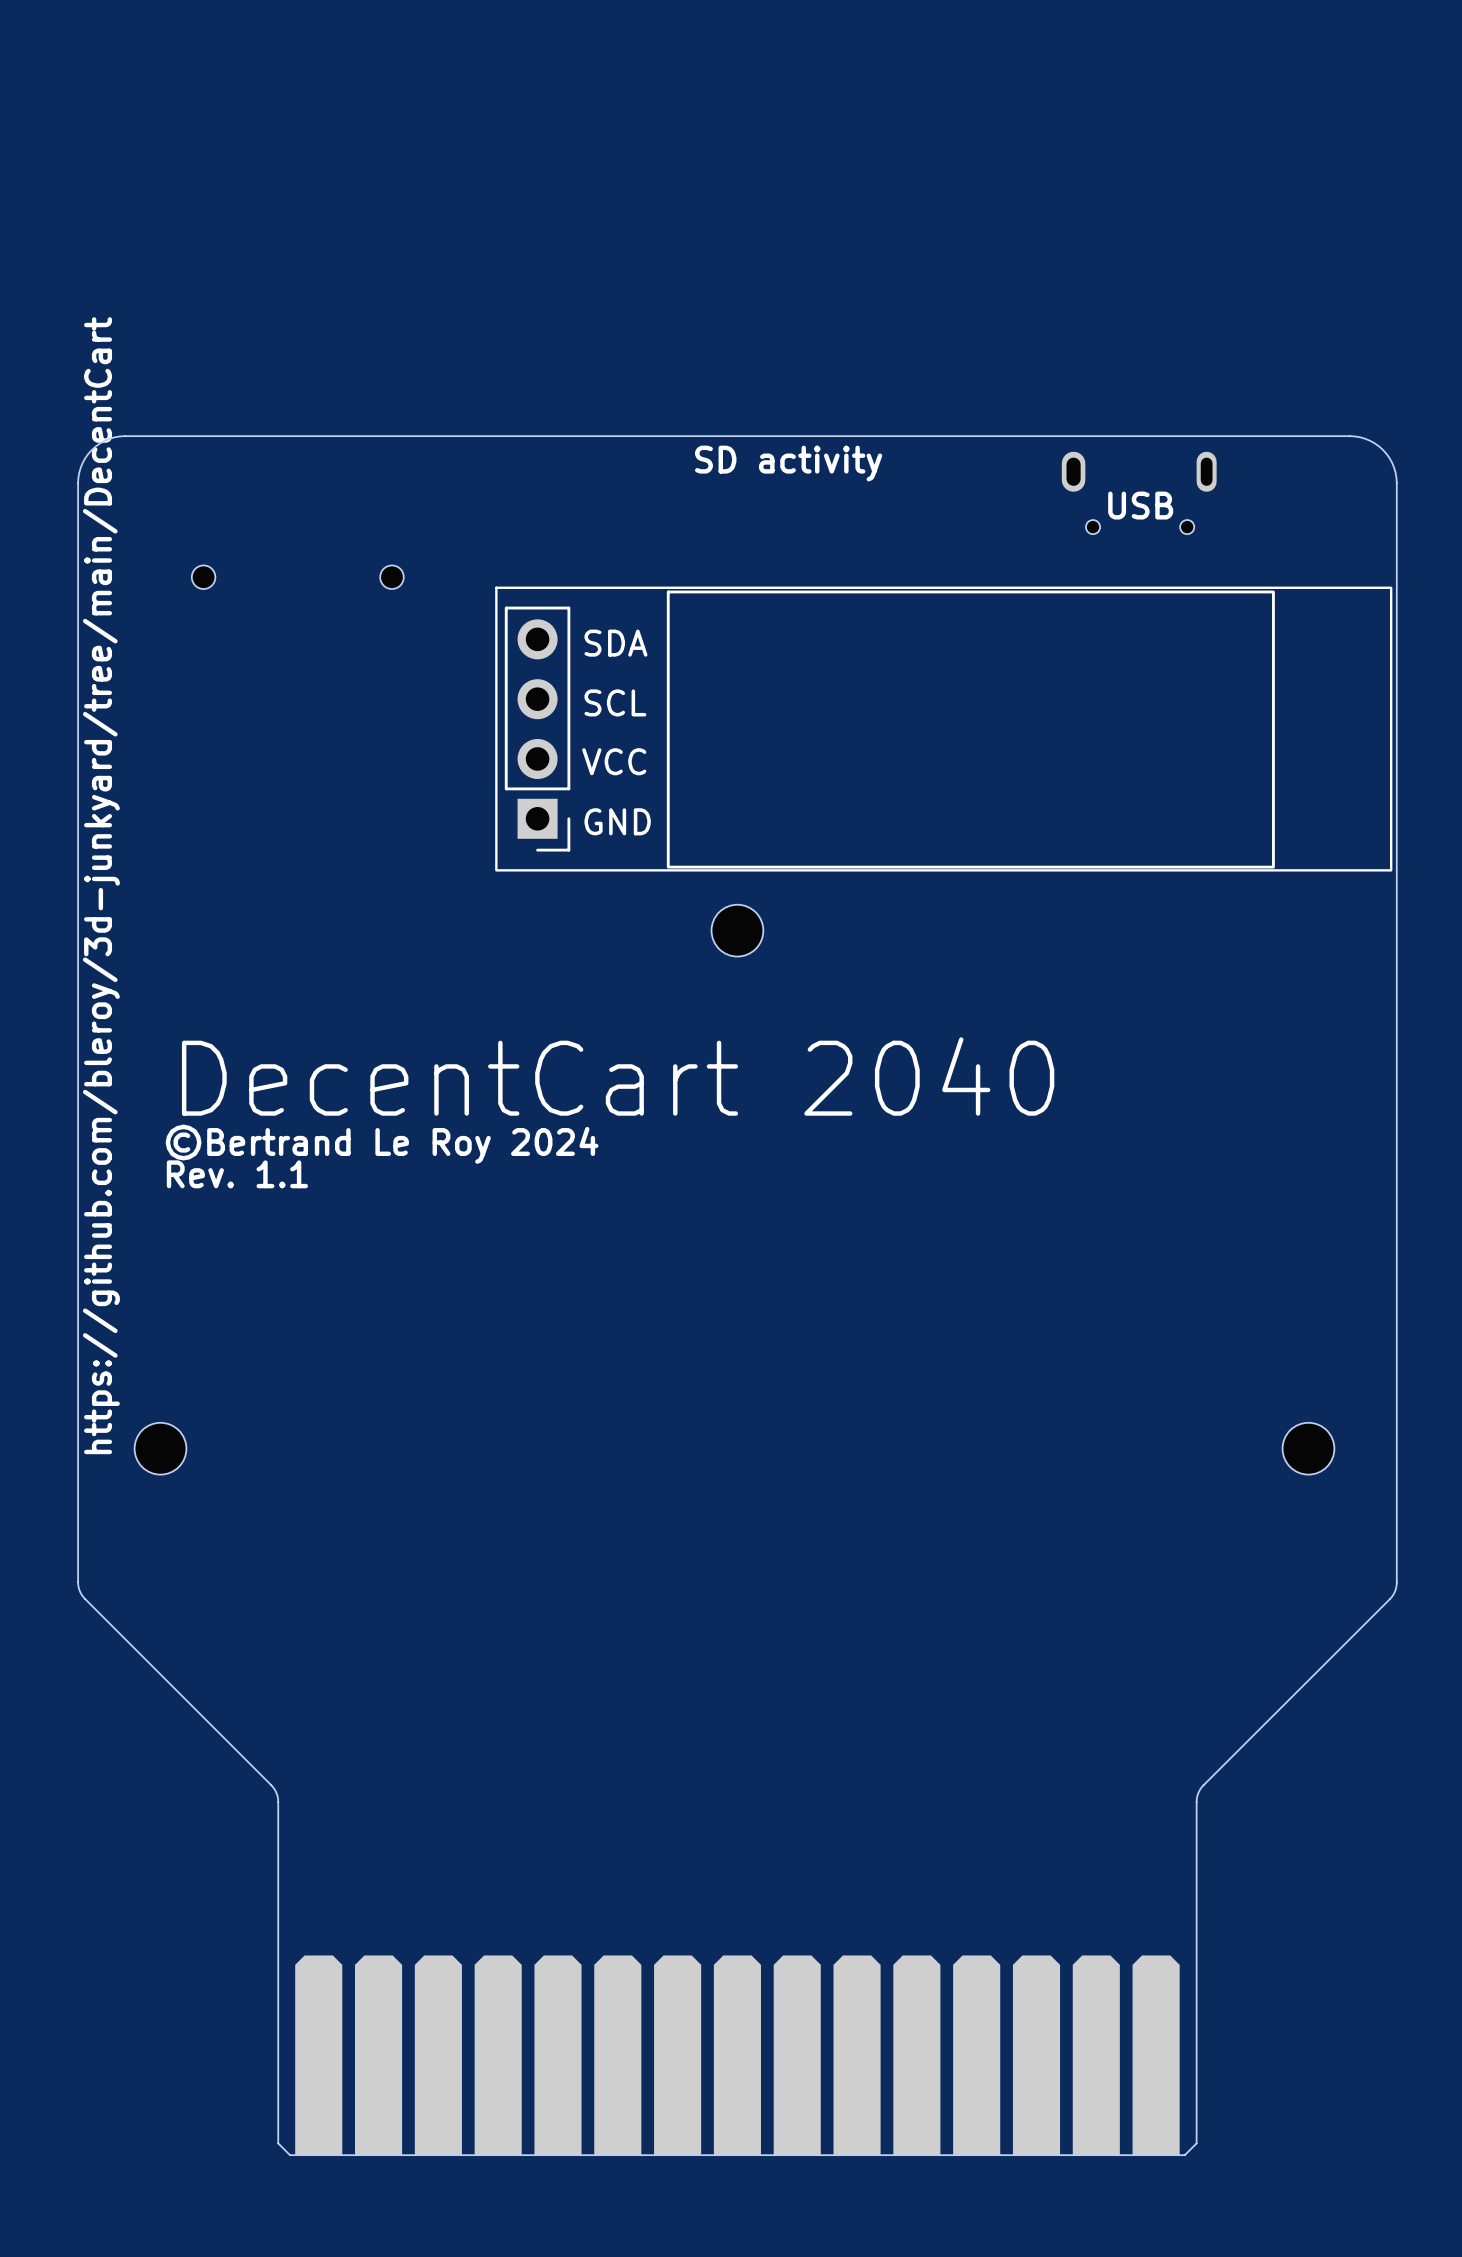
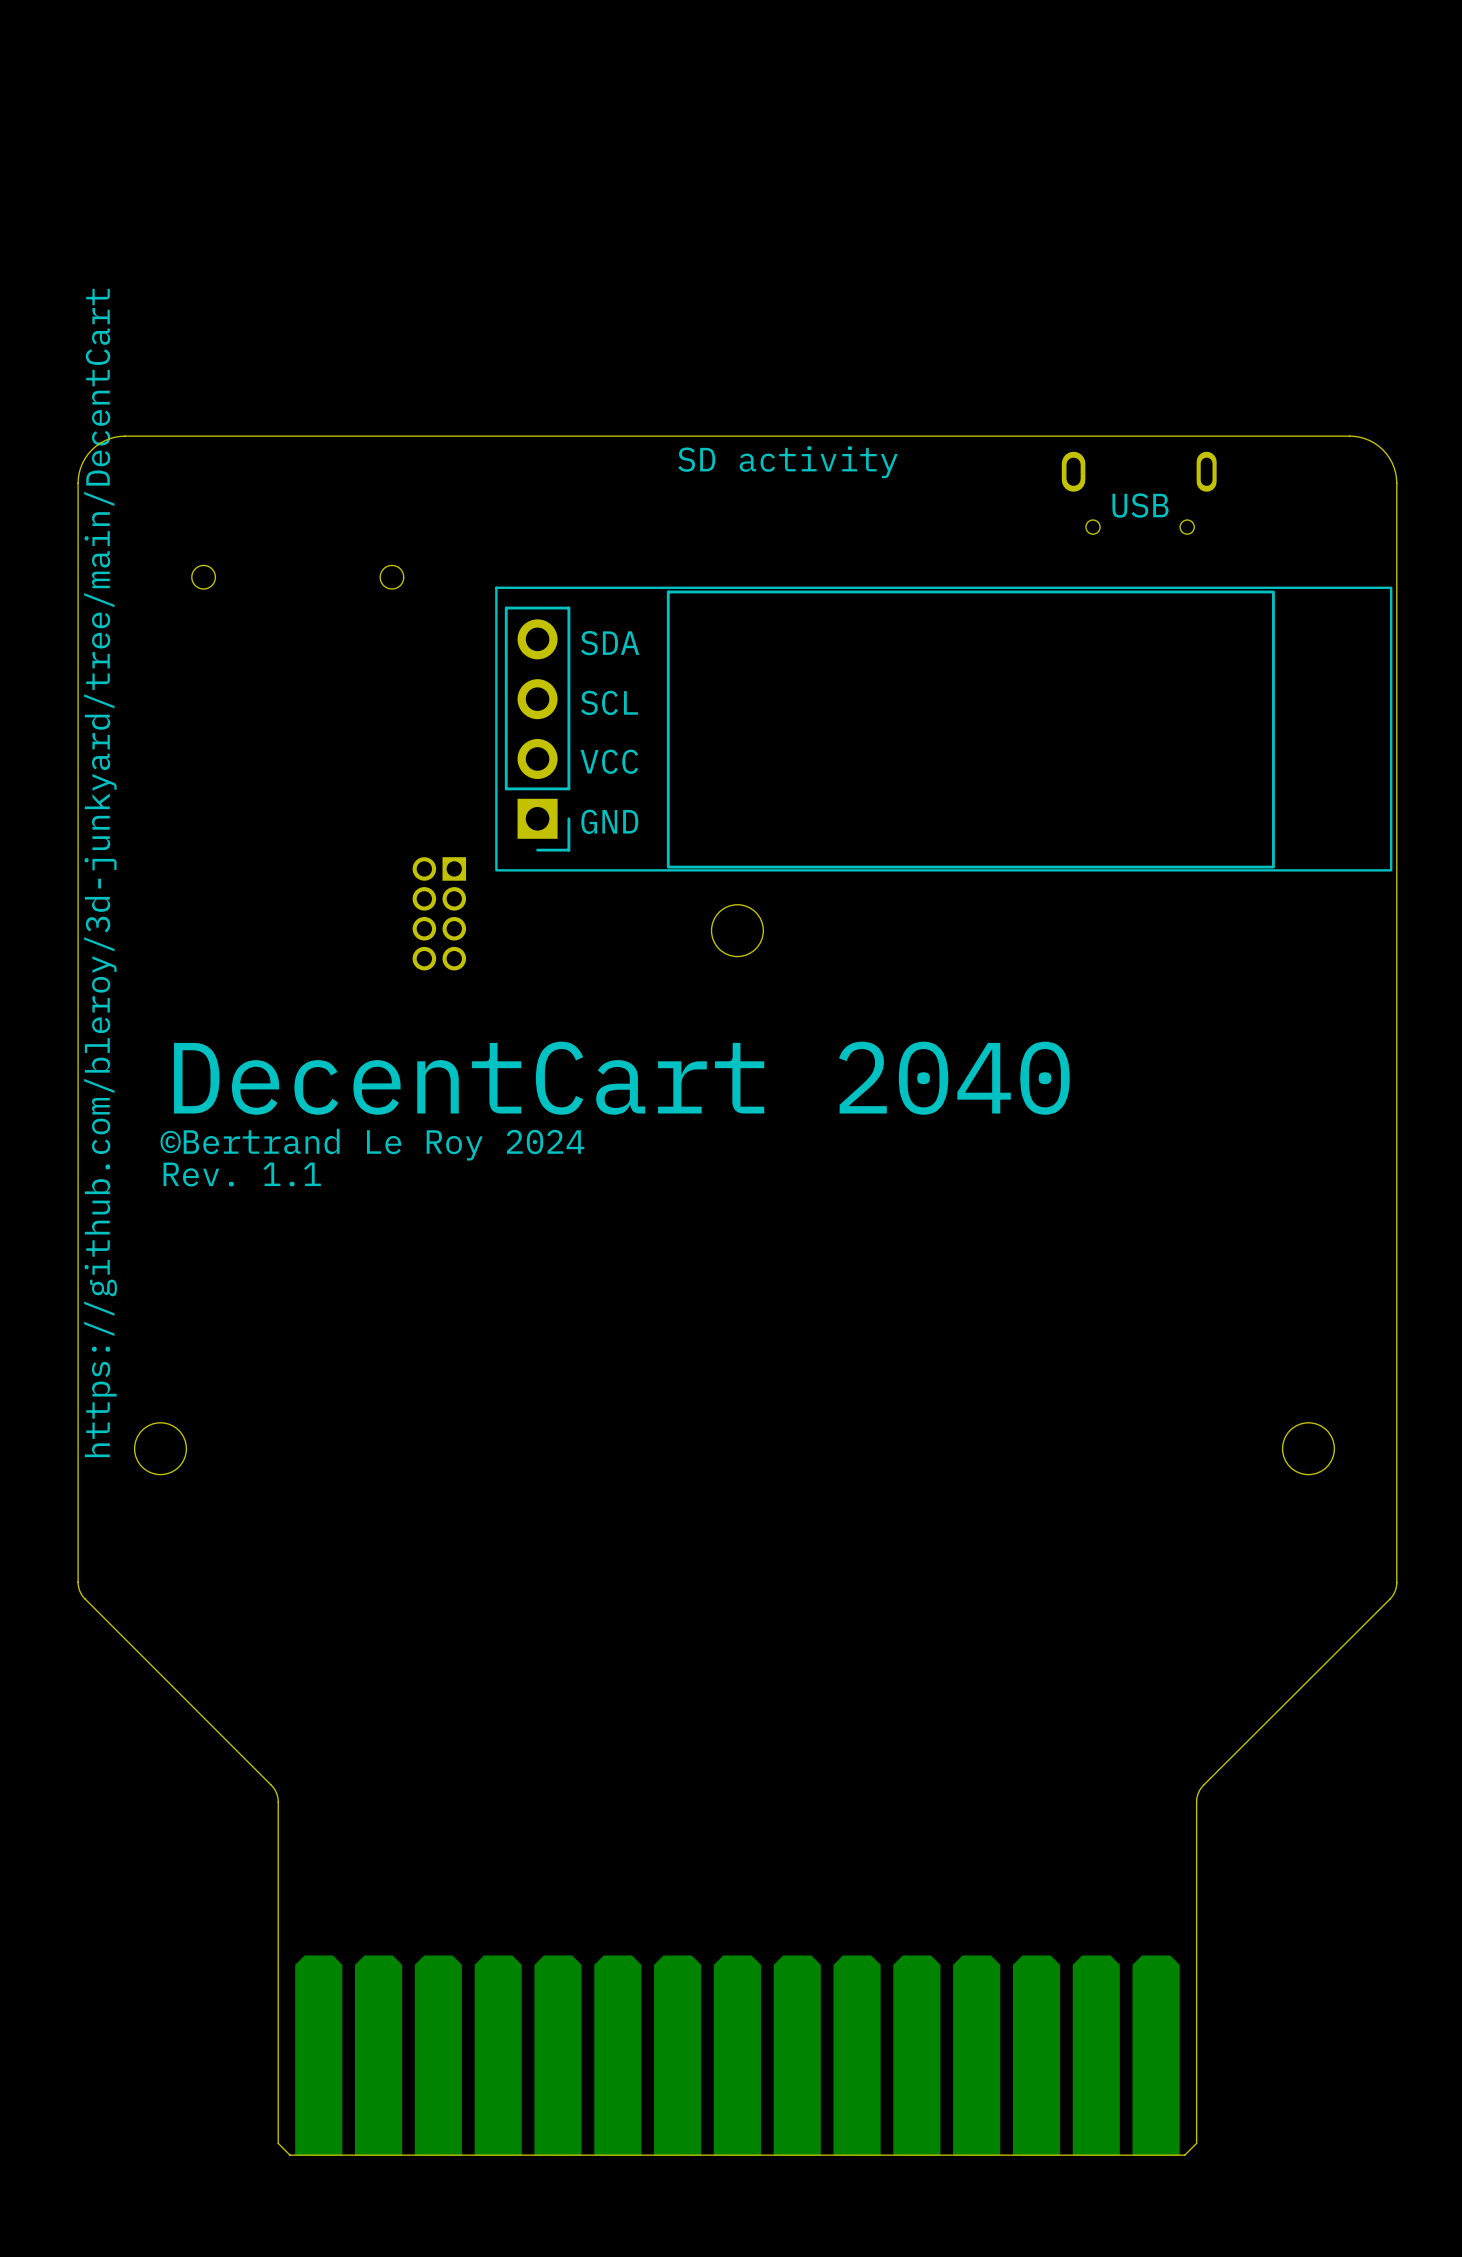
part: none -> (439, 913)

